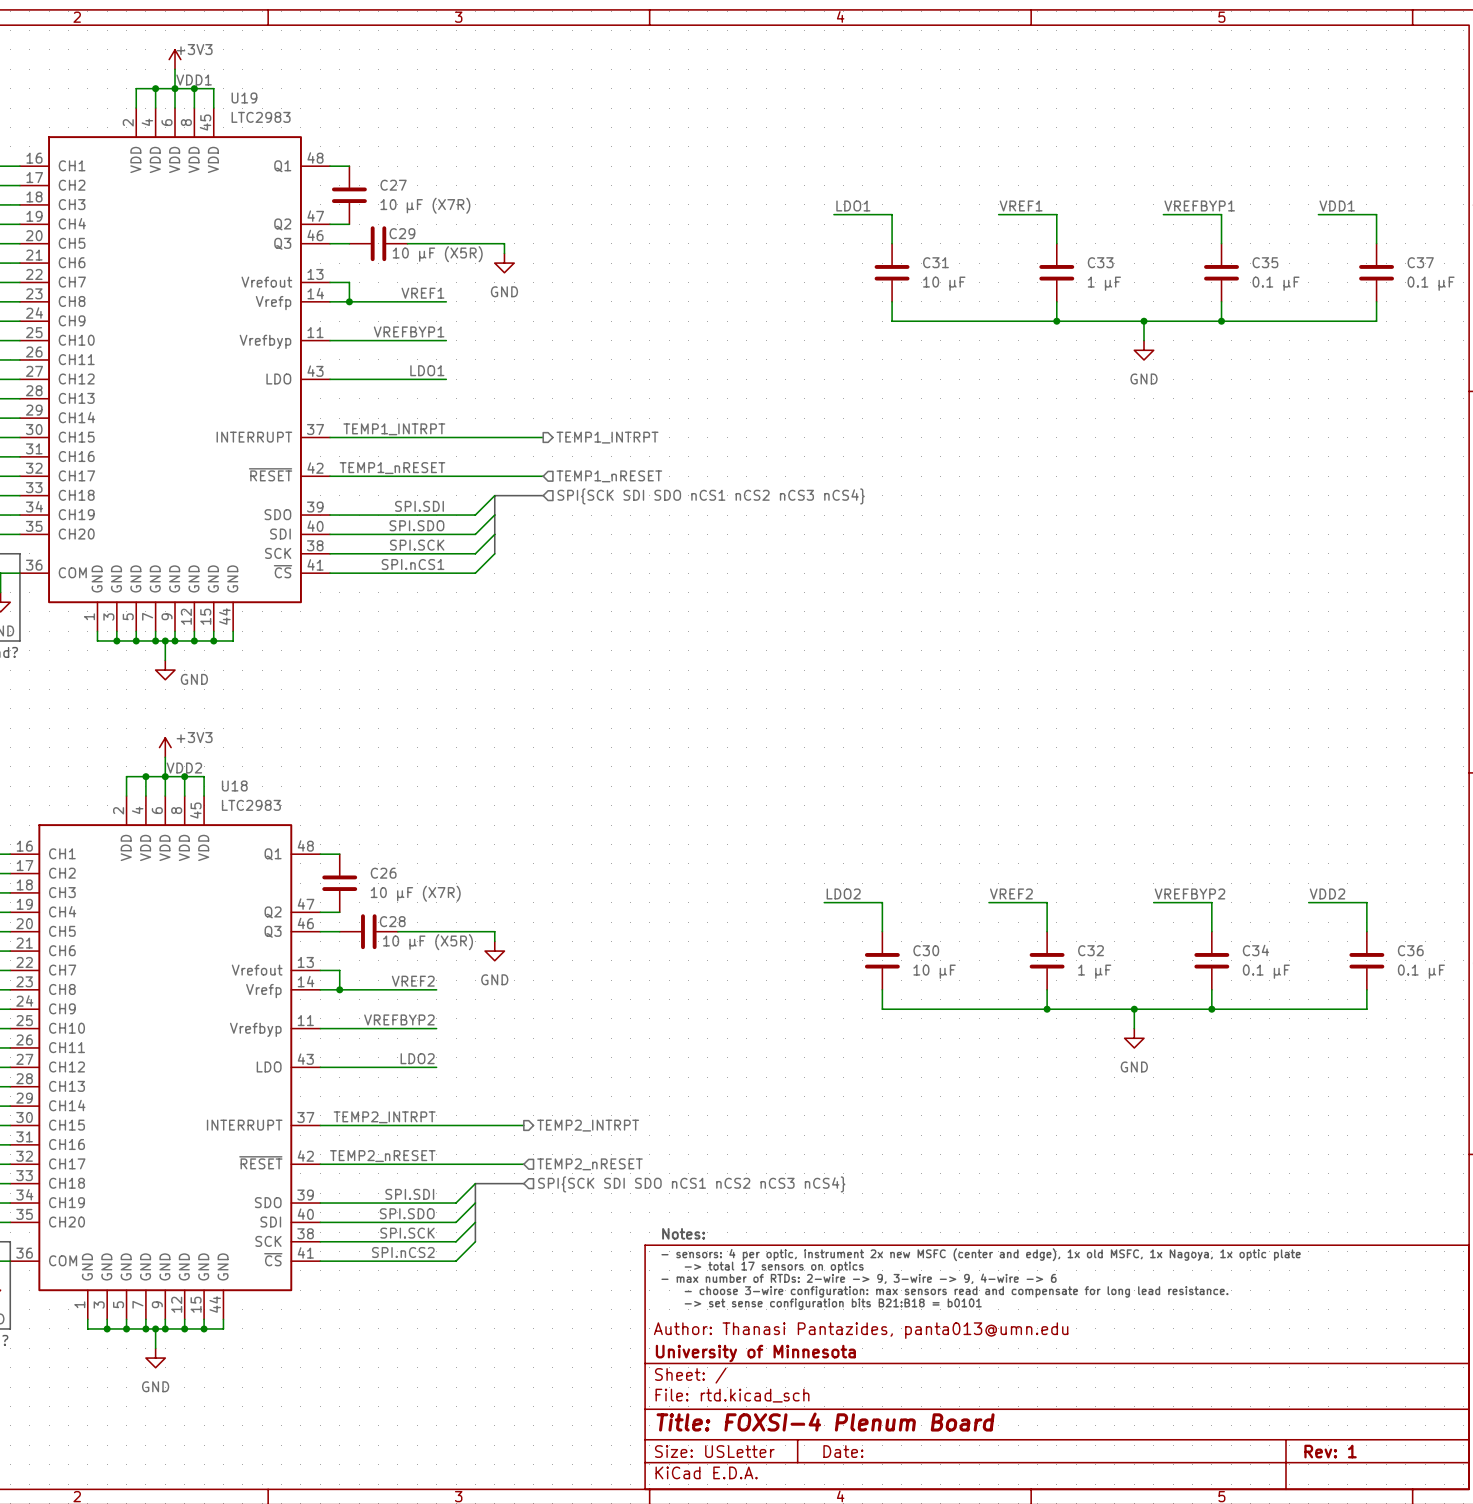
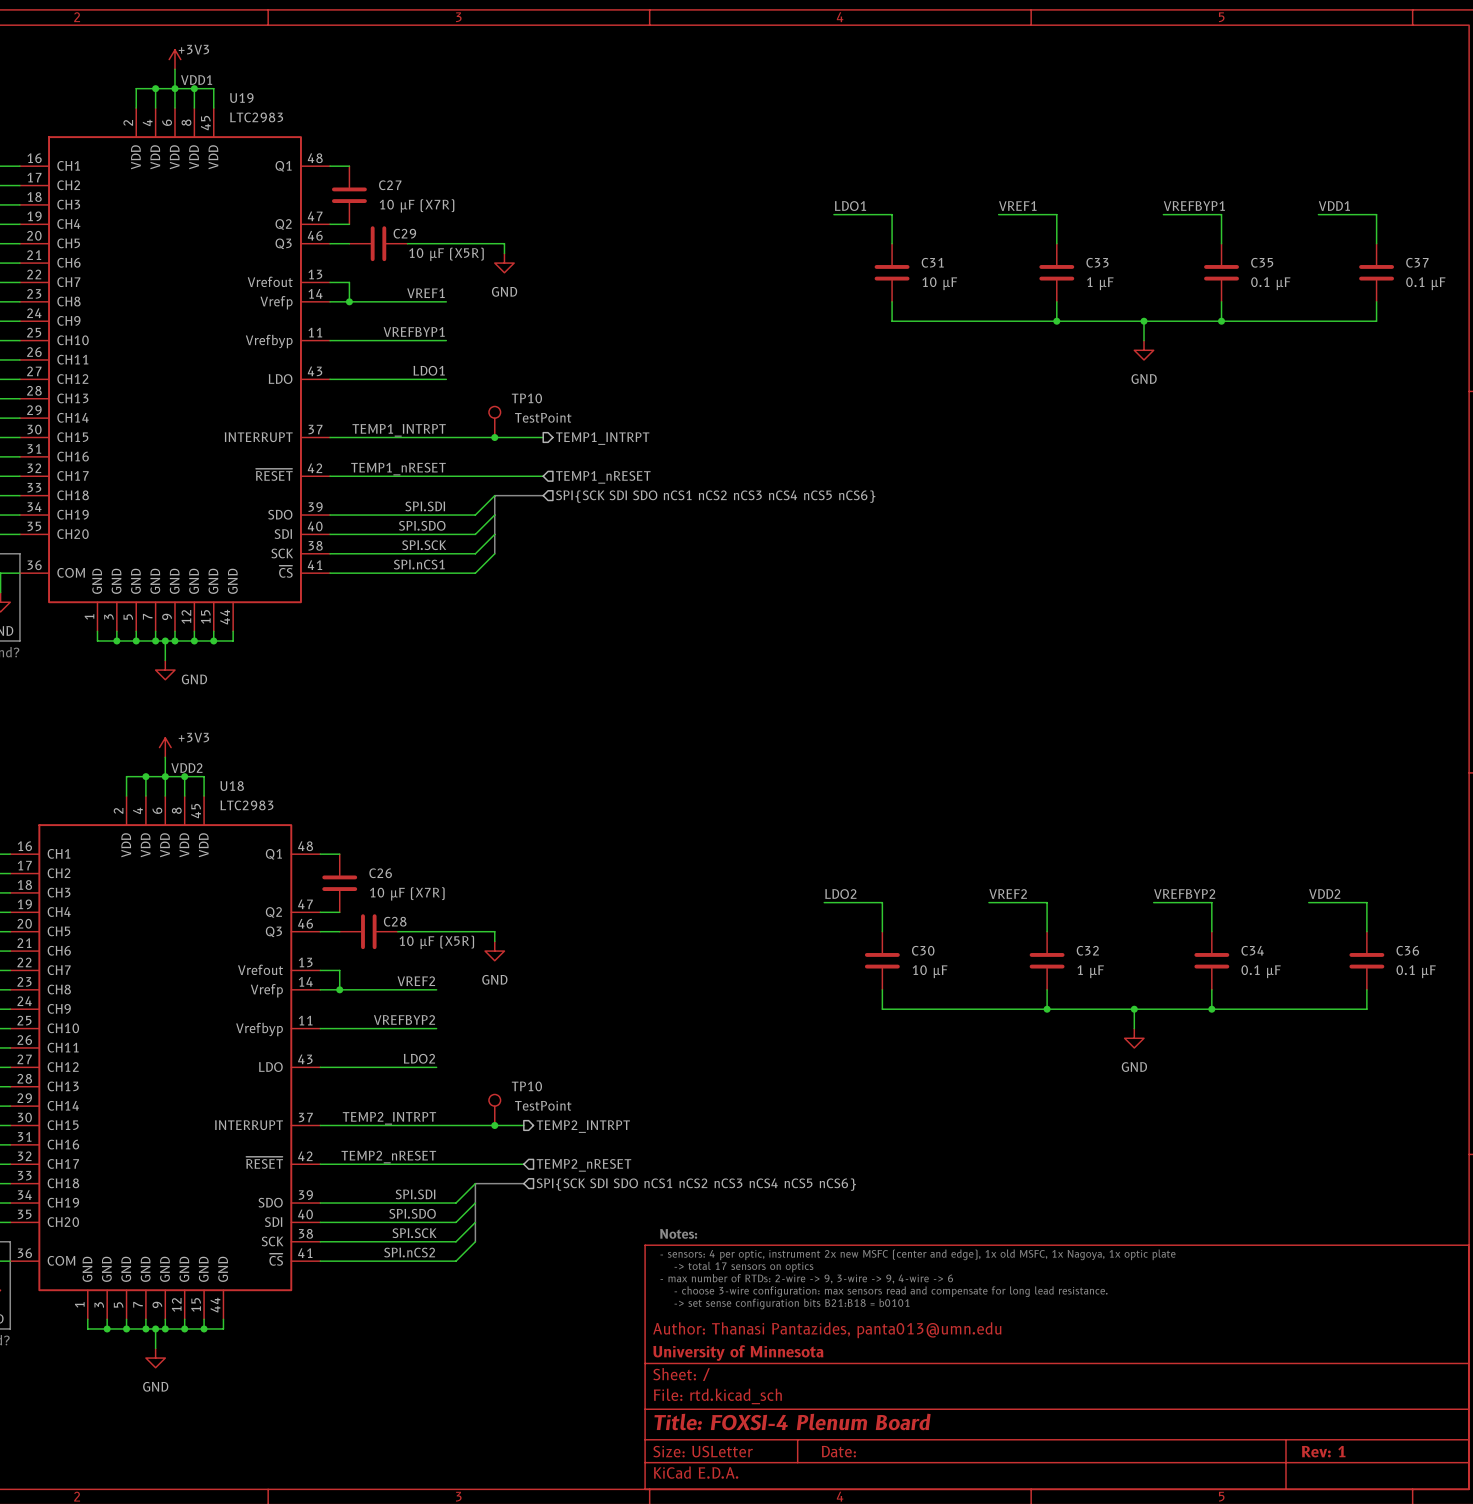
TP10: none -> TestPoint (494, 422)
junction: none -> (494, 437)
hierarchical label: SPI{SCK SDI SDO nCS1 nCS2 nCS3 nCS4} (711, 496) -> SPI{SCK SDI SDO nCS1 nCS2 nCS3 nCS4 nCS5 nCS6} (715, 496)
TP10: none -> TestPoint (494, 1109)
junction: none -> (494, 1125)
hierarchical label: SPI{SCK SDI SDO nCS1 nCS2 nCS3 nCS4} (691, 1184) -> SPI{SCK SDI SDO nCS1 nCS2 nCS3 nCS4 nCS5 nCS6} (696, 1184)

